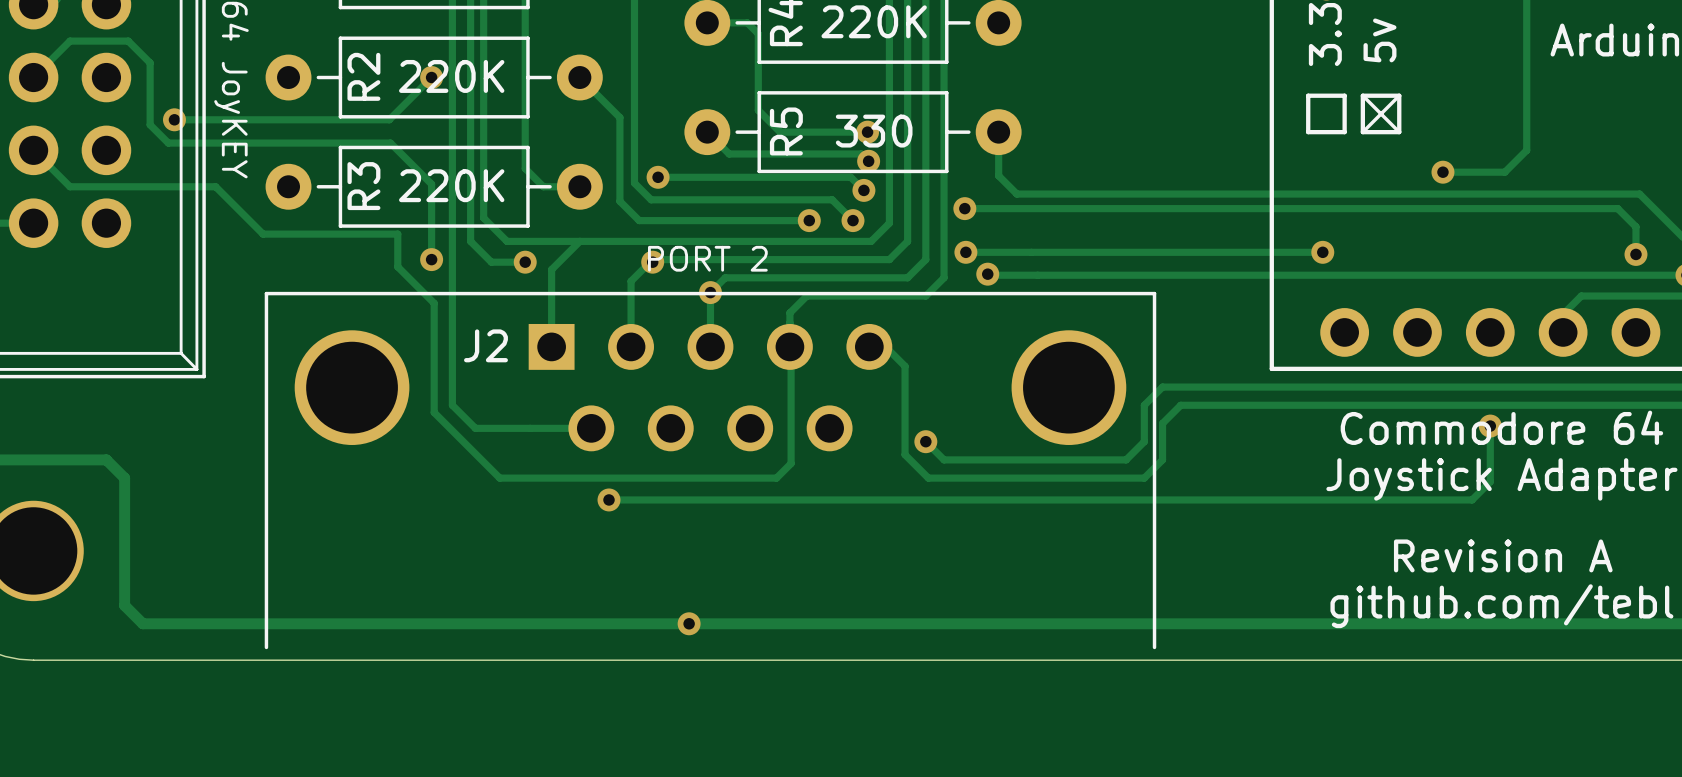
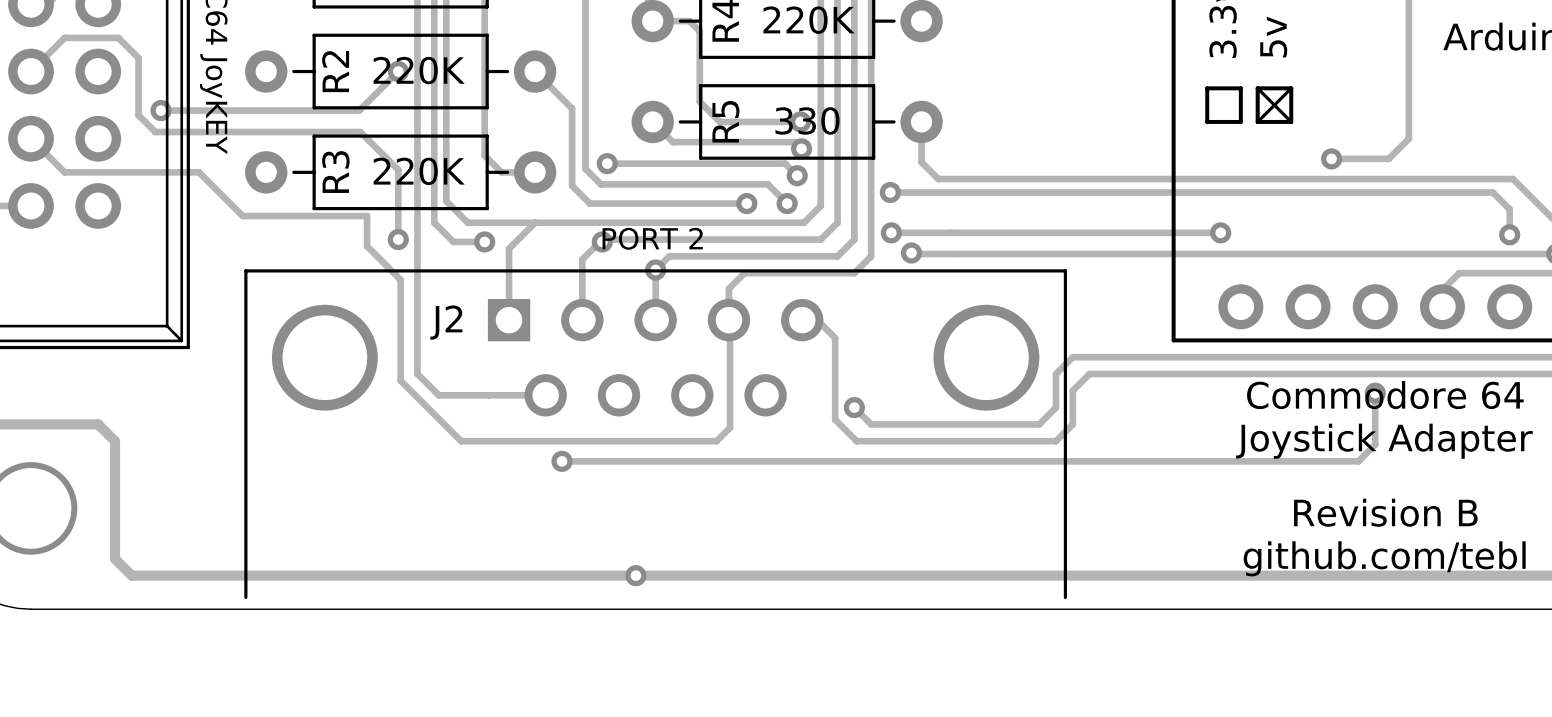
text: Revision A (1503, 555) -> Revision B (1385, 512)

